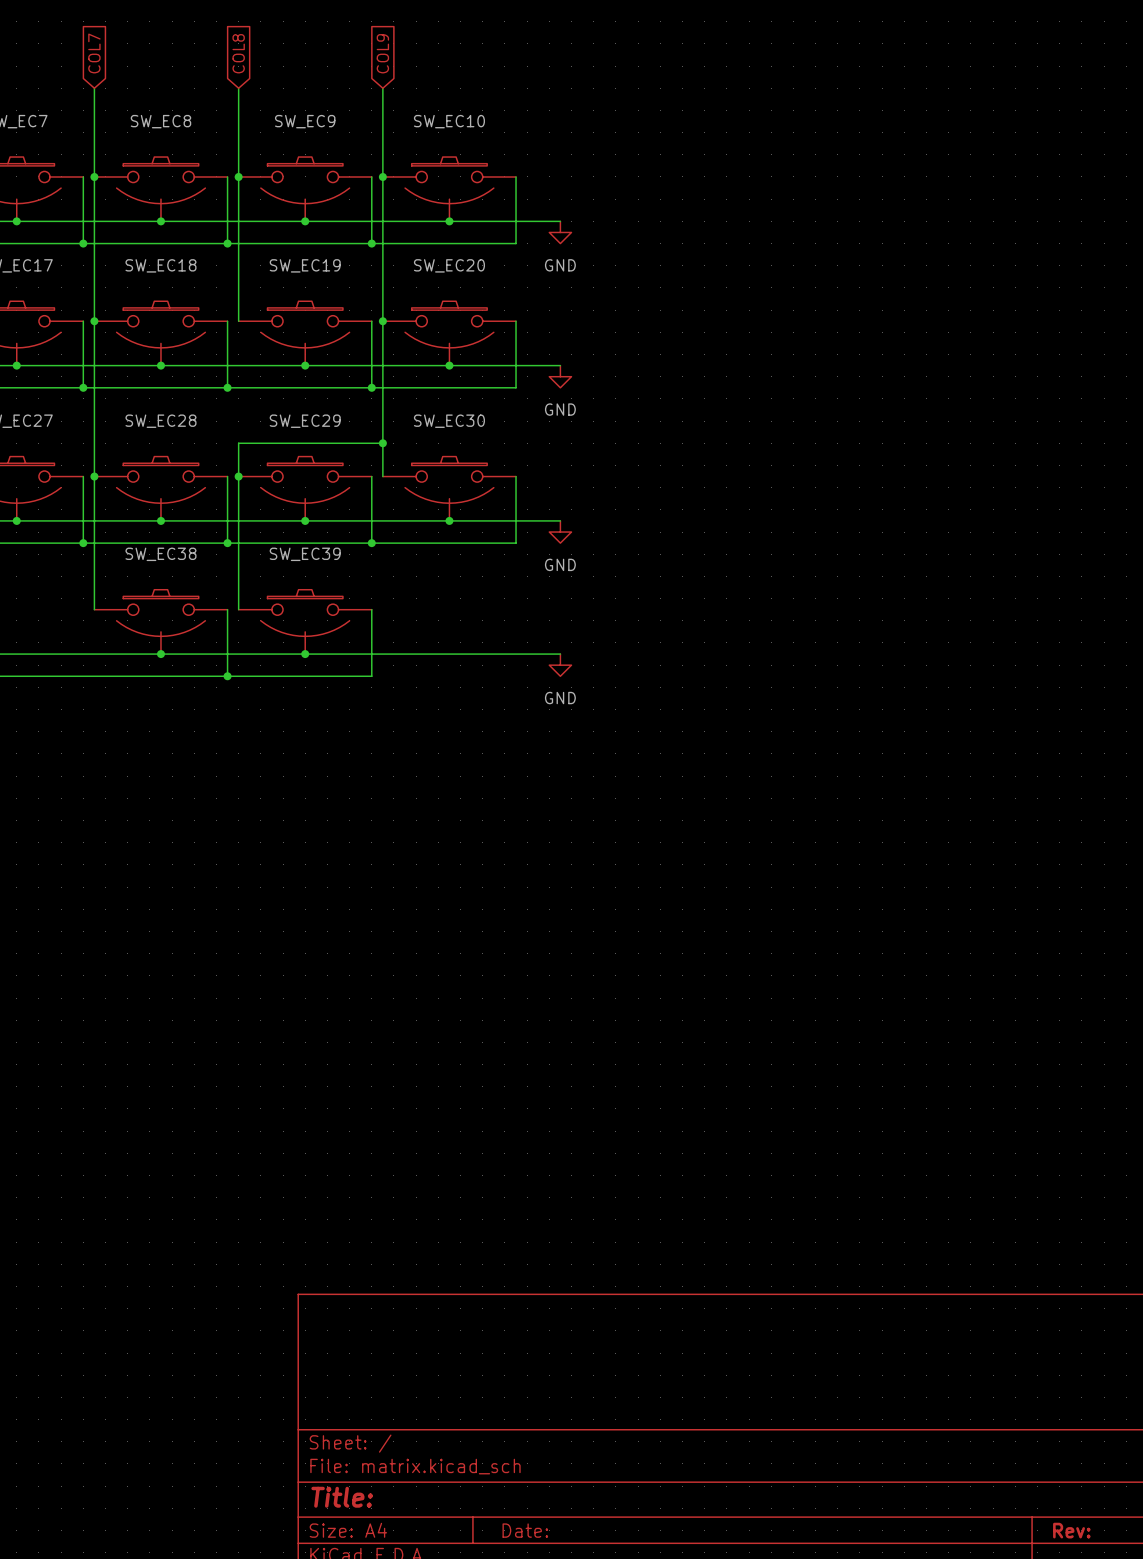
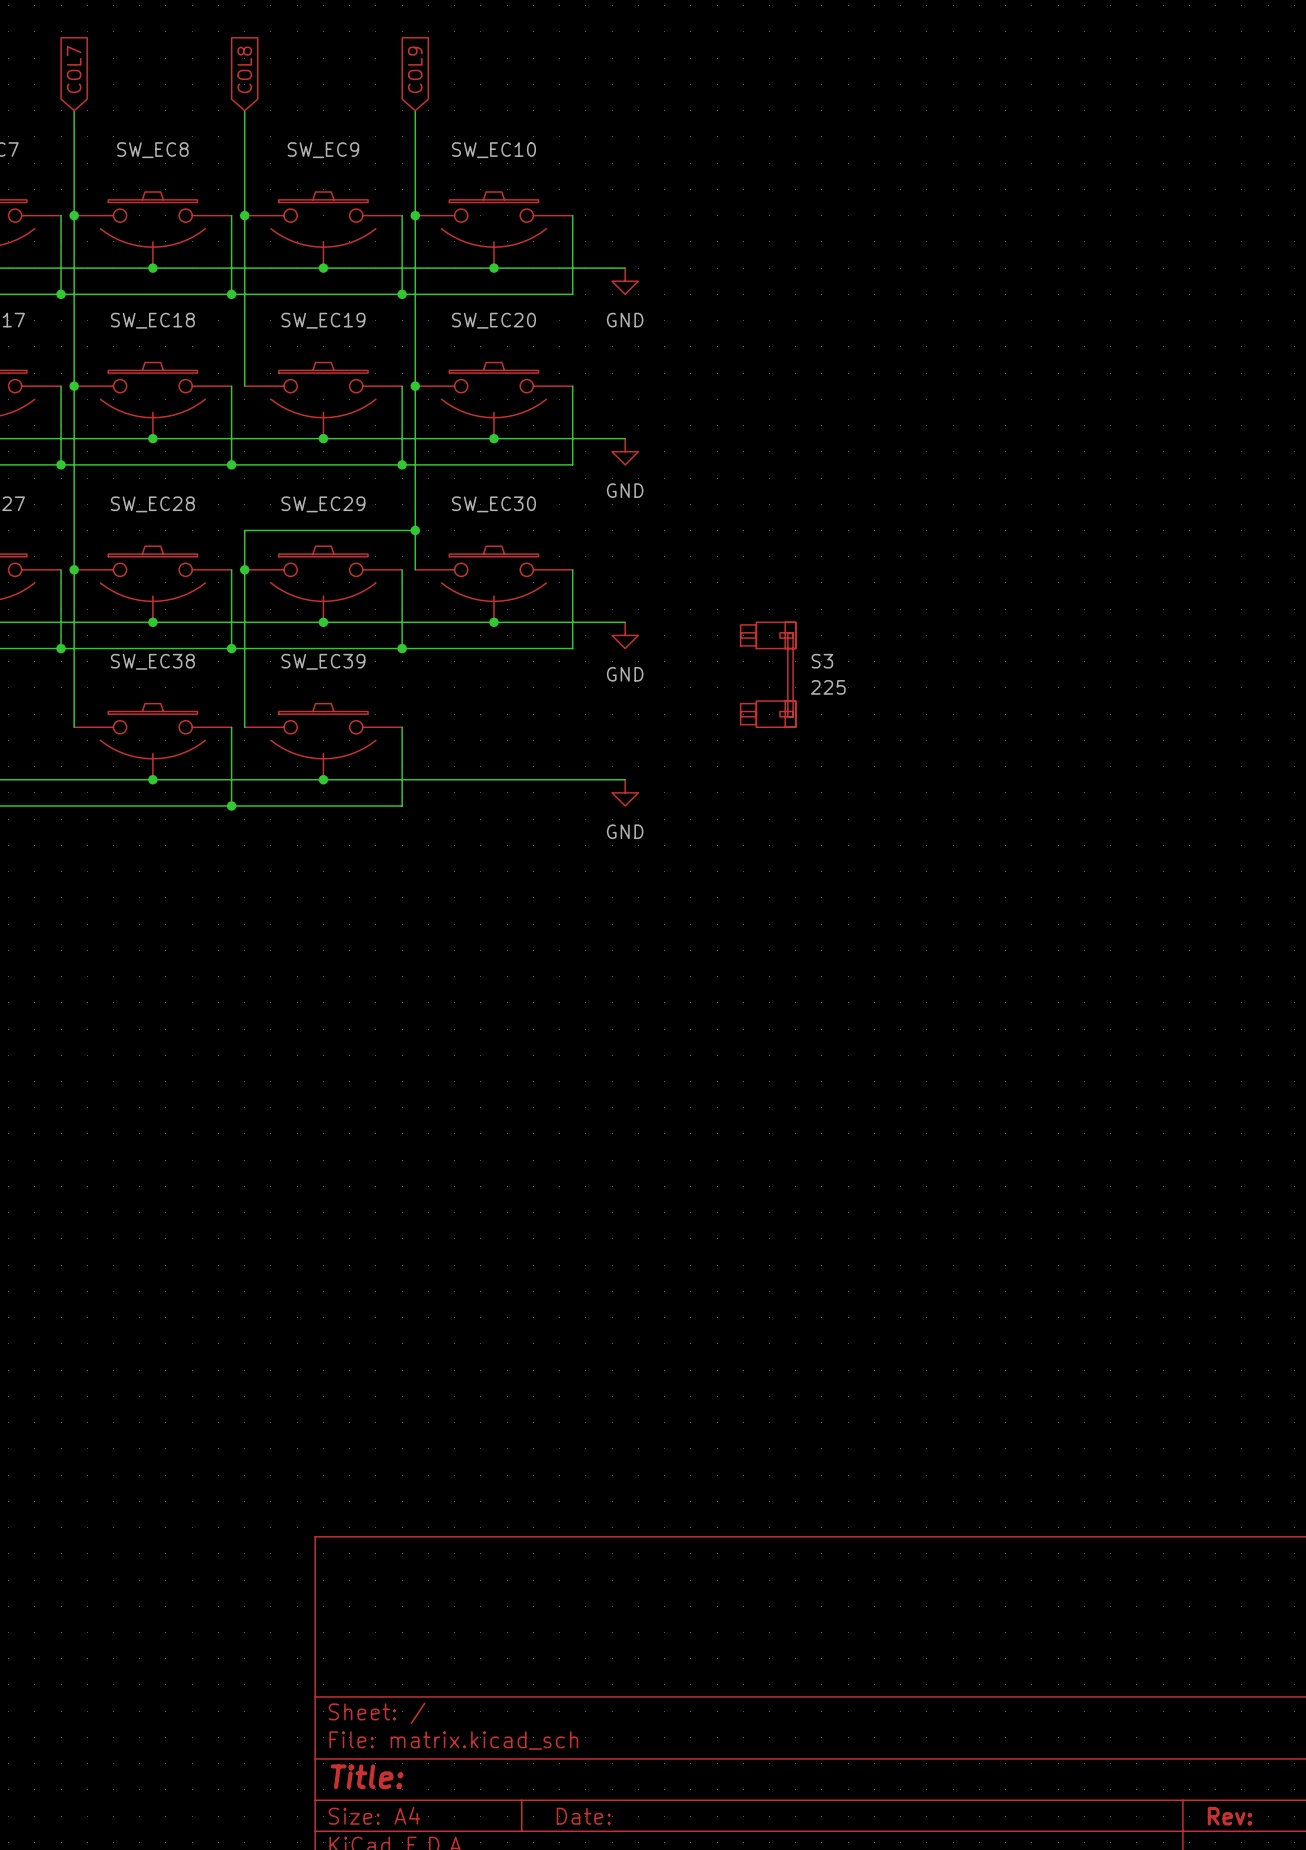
S3: none -> 225 (768, 674)

